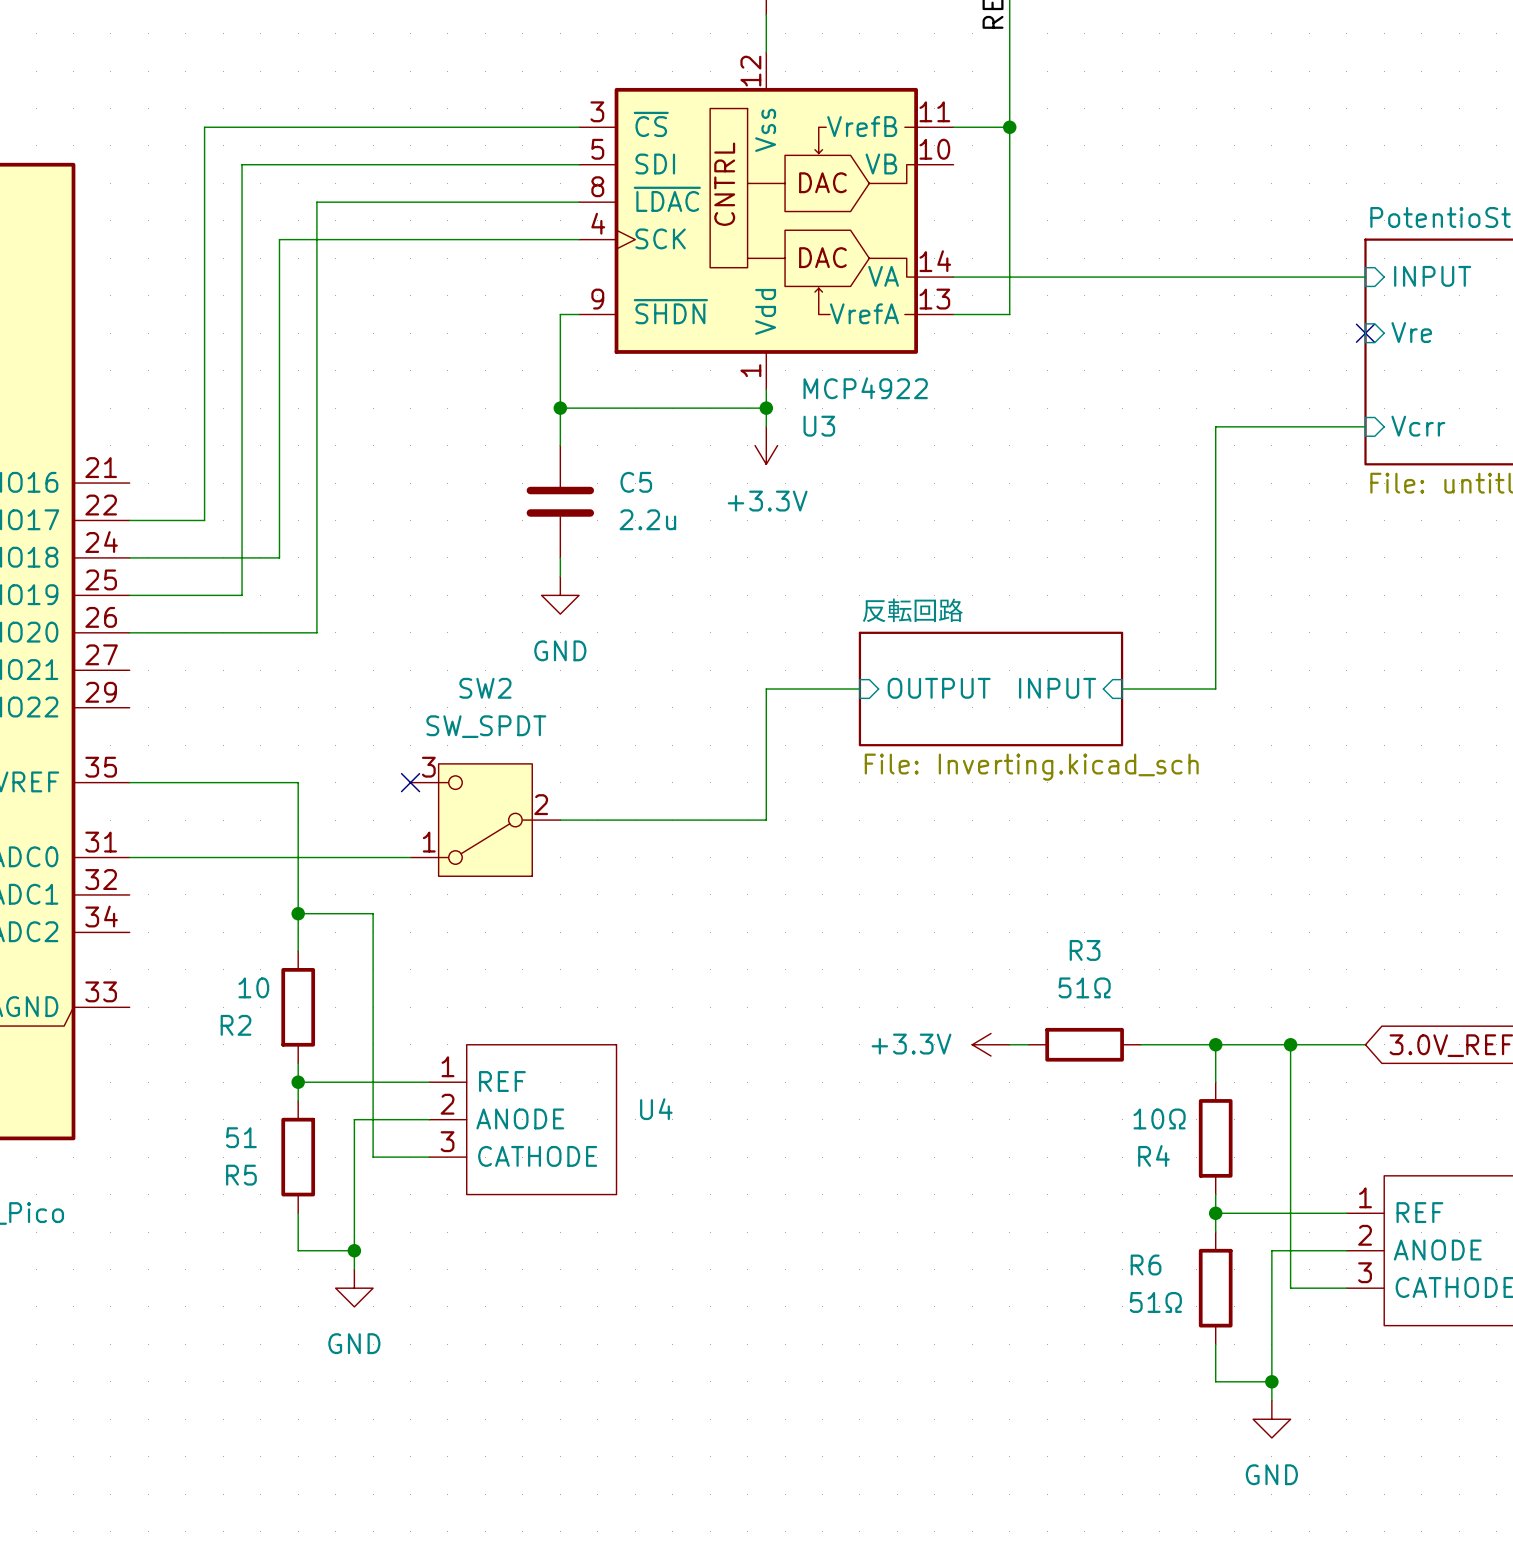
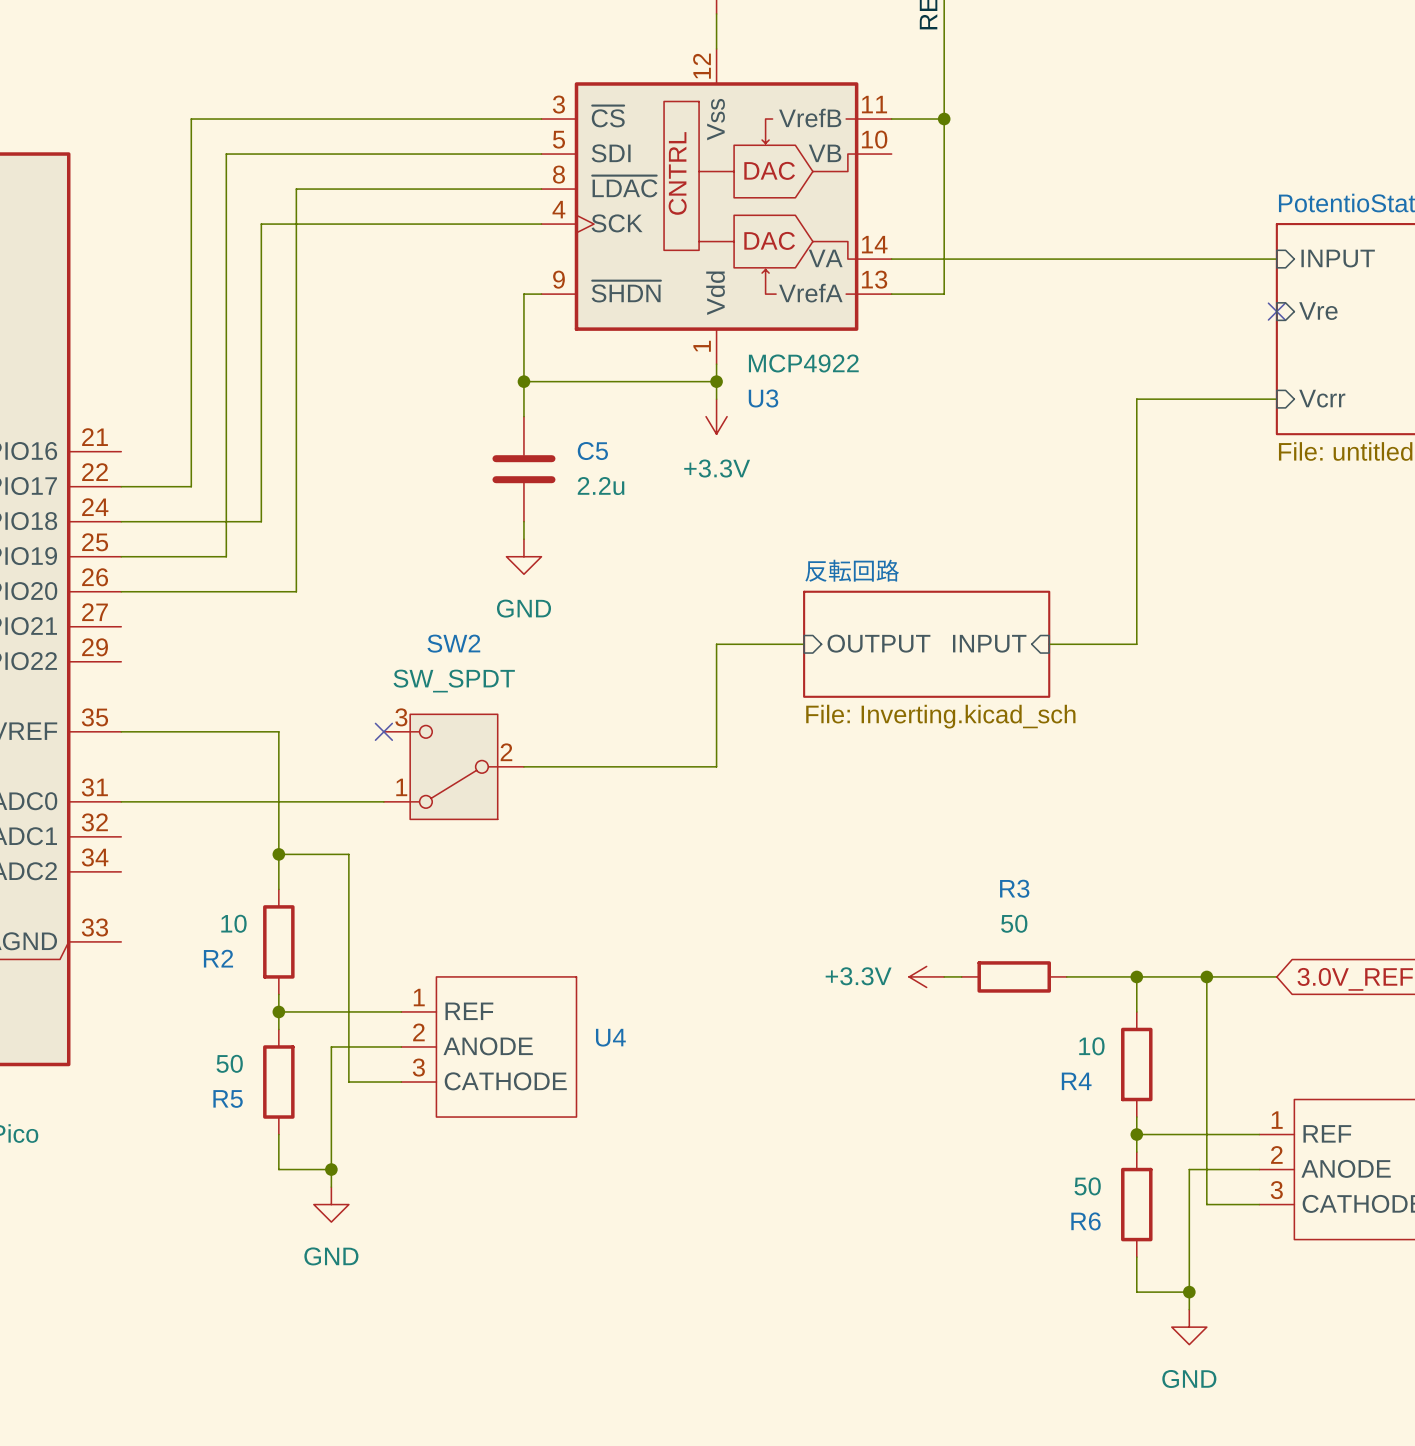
R3 value: 51Ω (1084, 987) -> 50 (1014, 923)
R4 value: 10Ω (1159, 1118) -> 10 (1091, 1046)
R5 value: 51 (241, 1137) -> 50 (229, 1063)
R6 name position: R6 (1146, 1265) -> R6 (1085, 1221)
R6 value: 51Ω (1155, 1302) -> 50 (1087, 1186)

